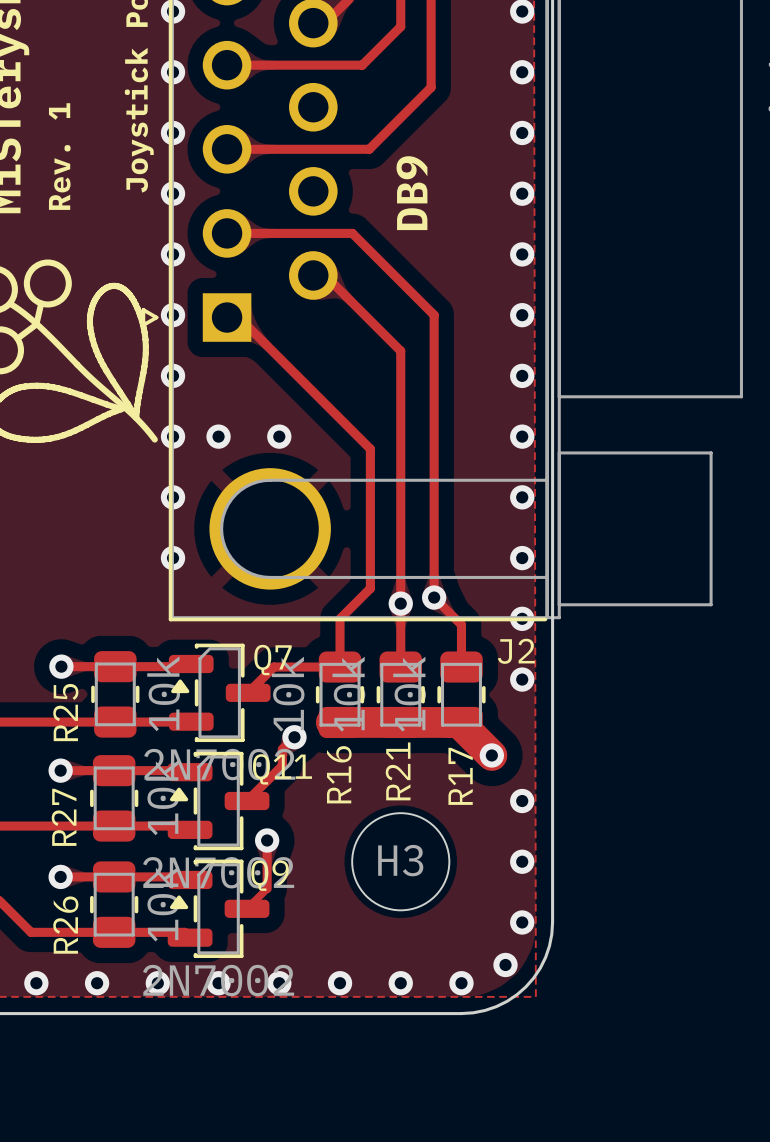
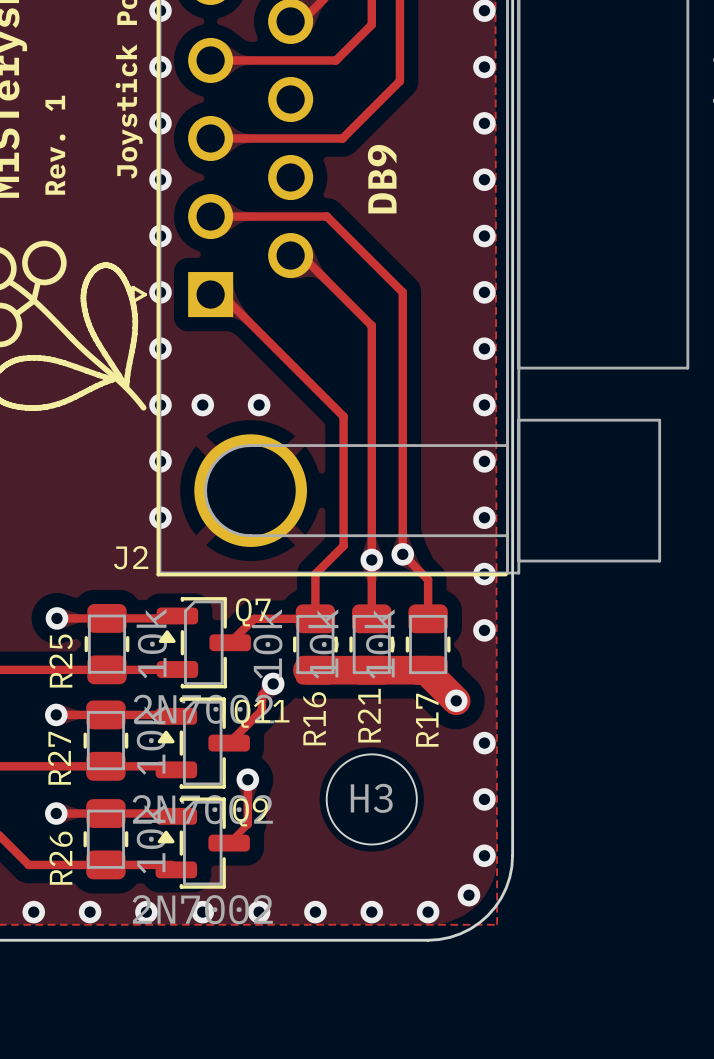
J2 name position: J2 (516, 651) -> J2 (131, 557)

